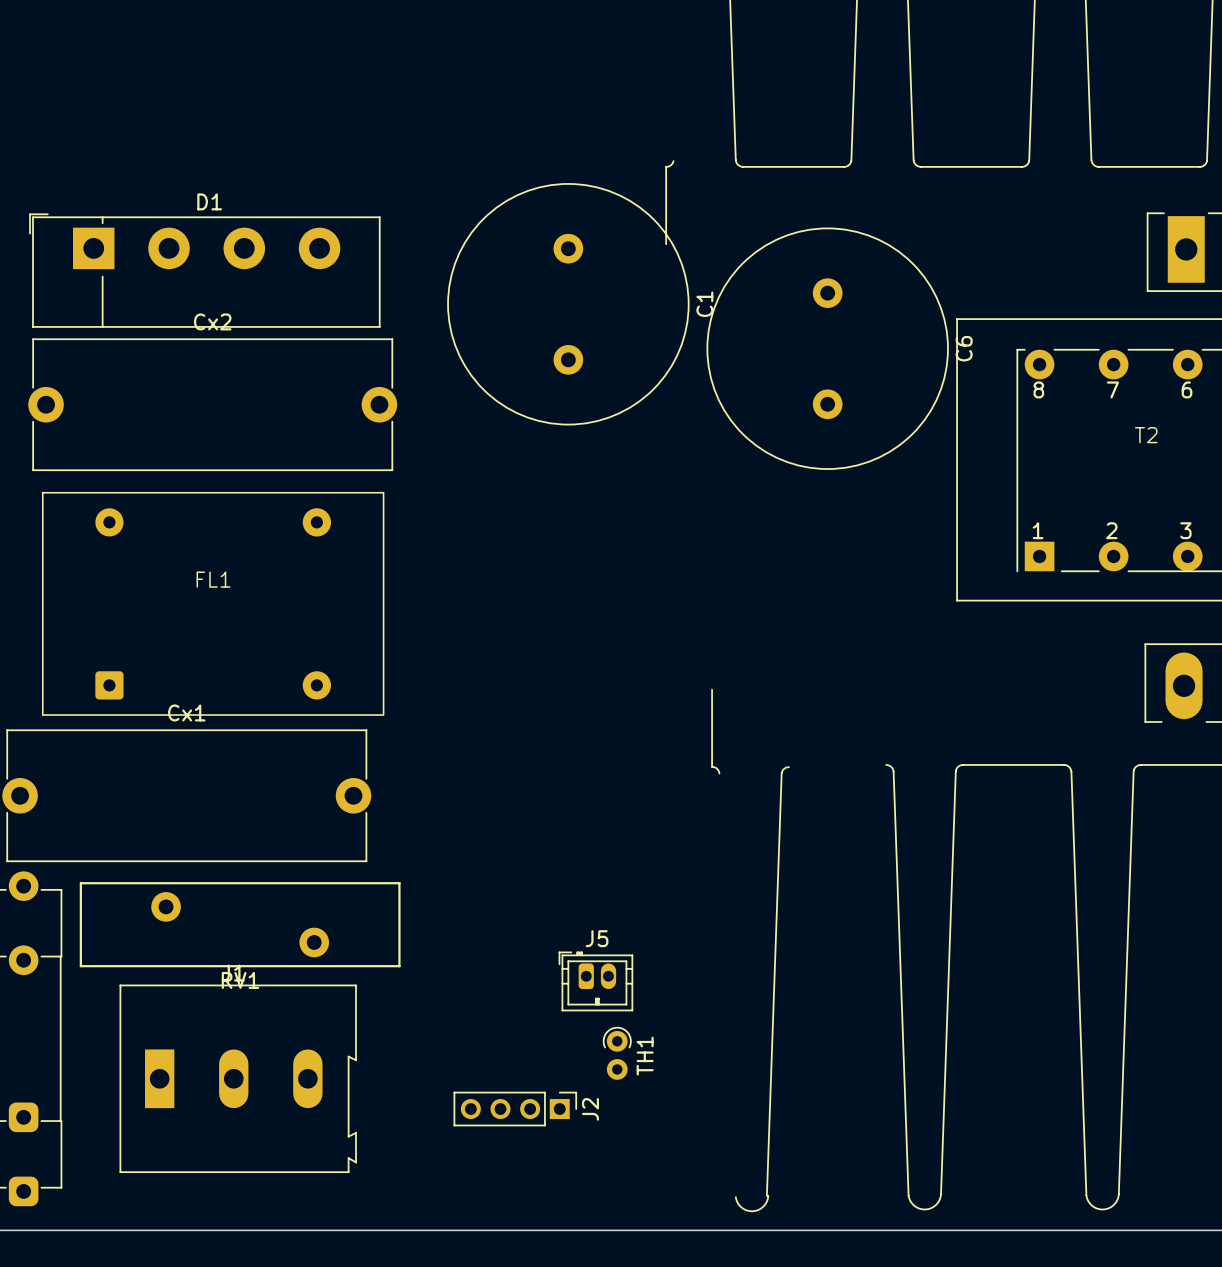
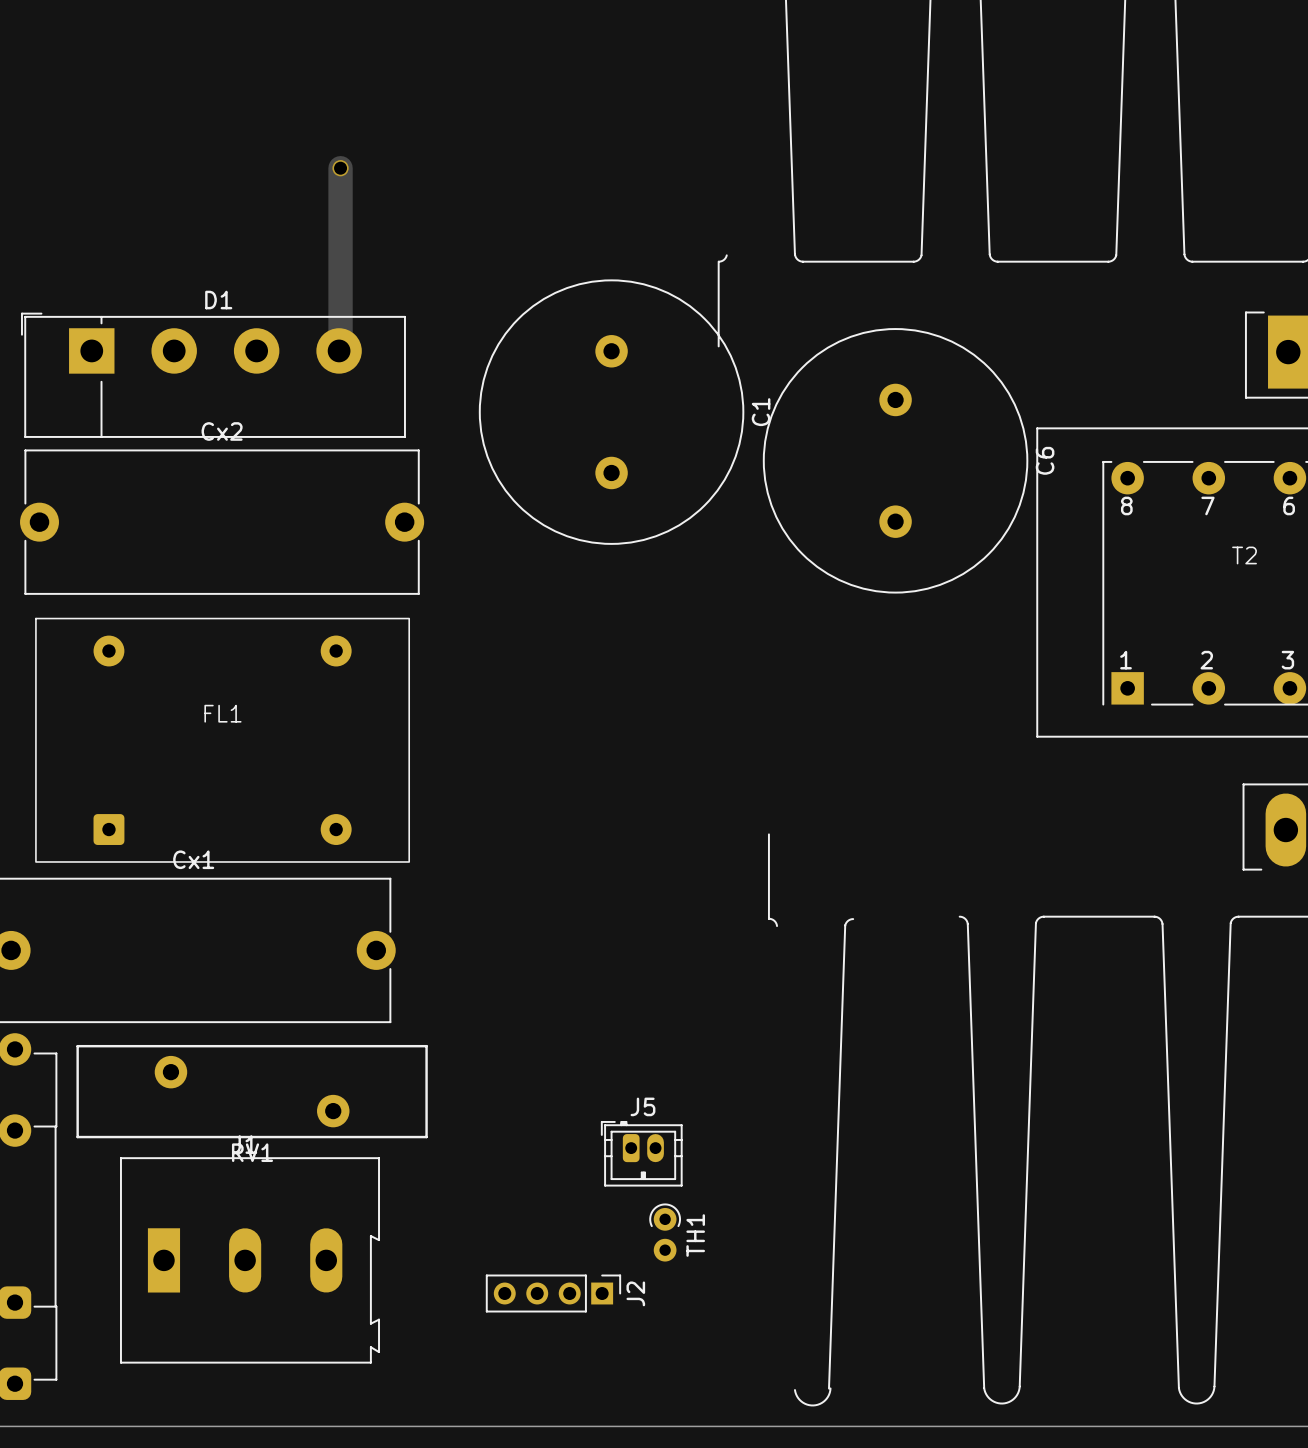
track: none -> (340, 168) (339, 350)
via: none -> (340, 168)

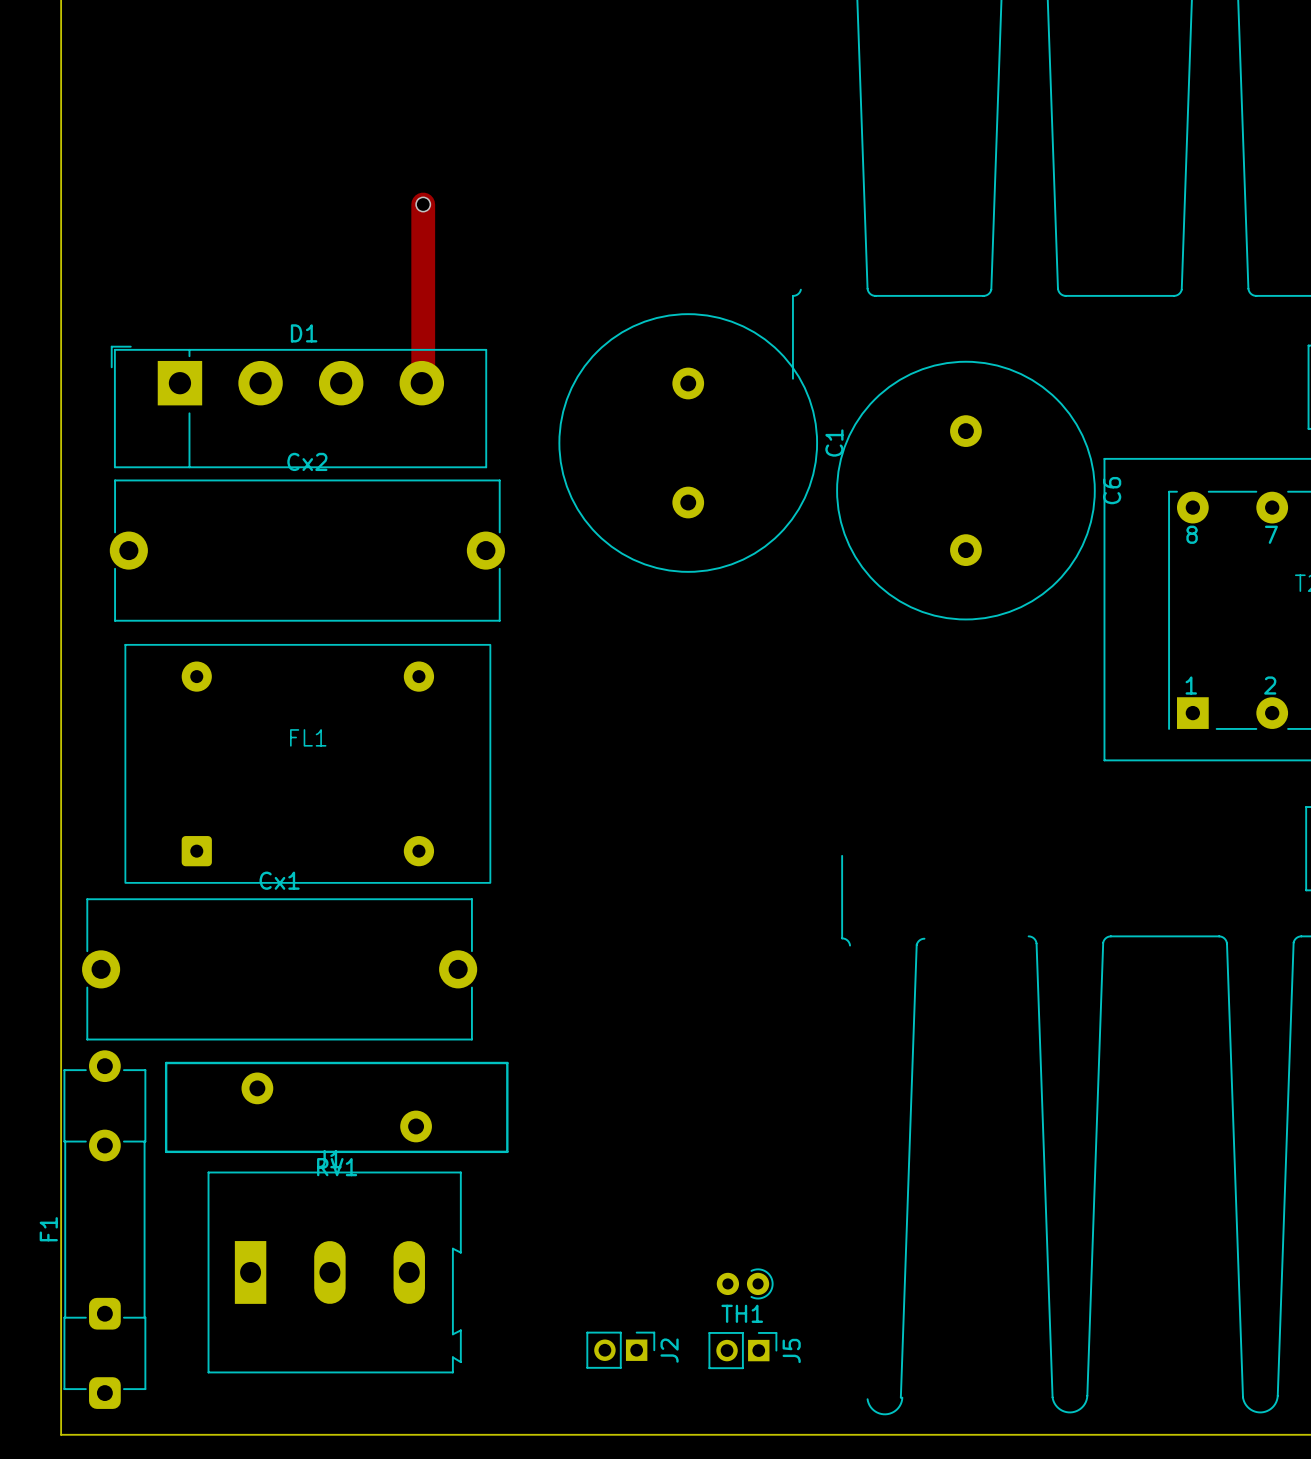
J5 name position: J5 (642, 1106) -> J5 (791, 1350)
J5 footprint: [600, 1120, 683, 1187] -> [708, 1332, 778, 1370]
TH1 rotation: 0° (665, 1232) -> 90° clockwise (745, 1283)
TH1 position: (665, 1232) -> (745, 1283)
J2 footprint: [485, 1274, 622, 1313] -> [586, 1331, 656, 1369]

